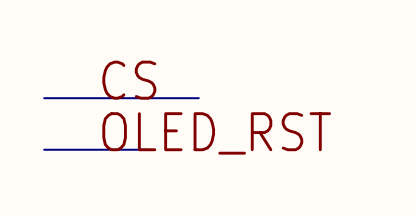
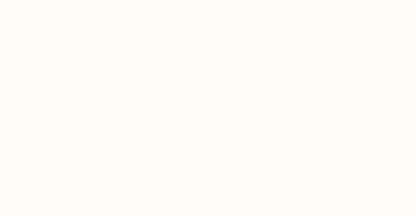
label: CS (129, 80) -> none
wire: (44, 98) (198, 98) -> none
label: OLED_RST (216, 133) -> none
wire: (44, 149) (147, 149) -> none

